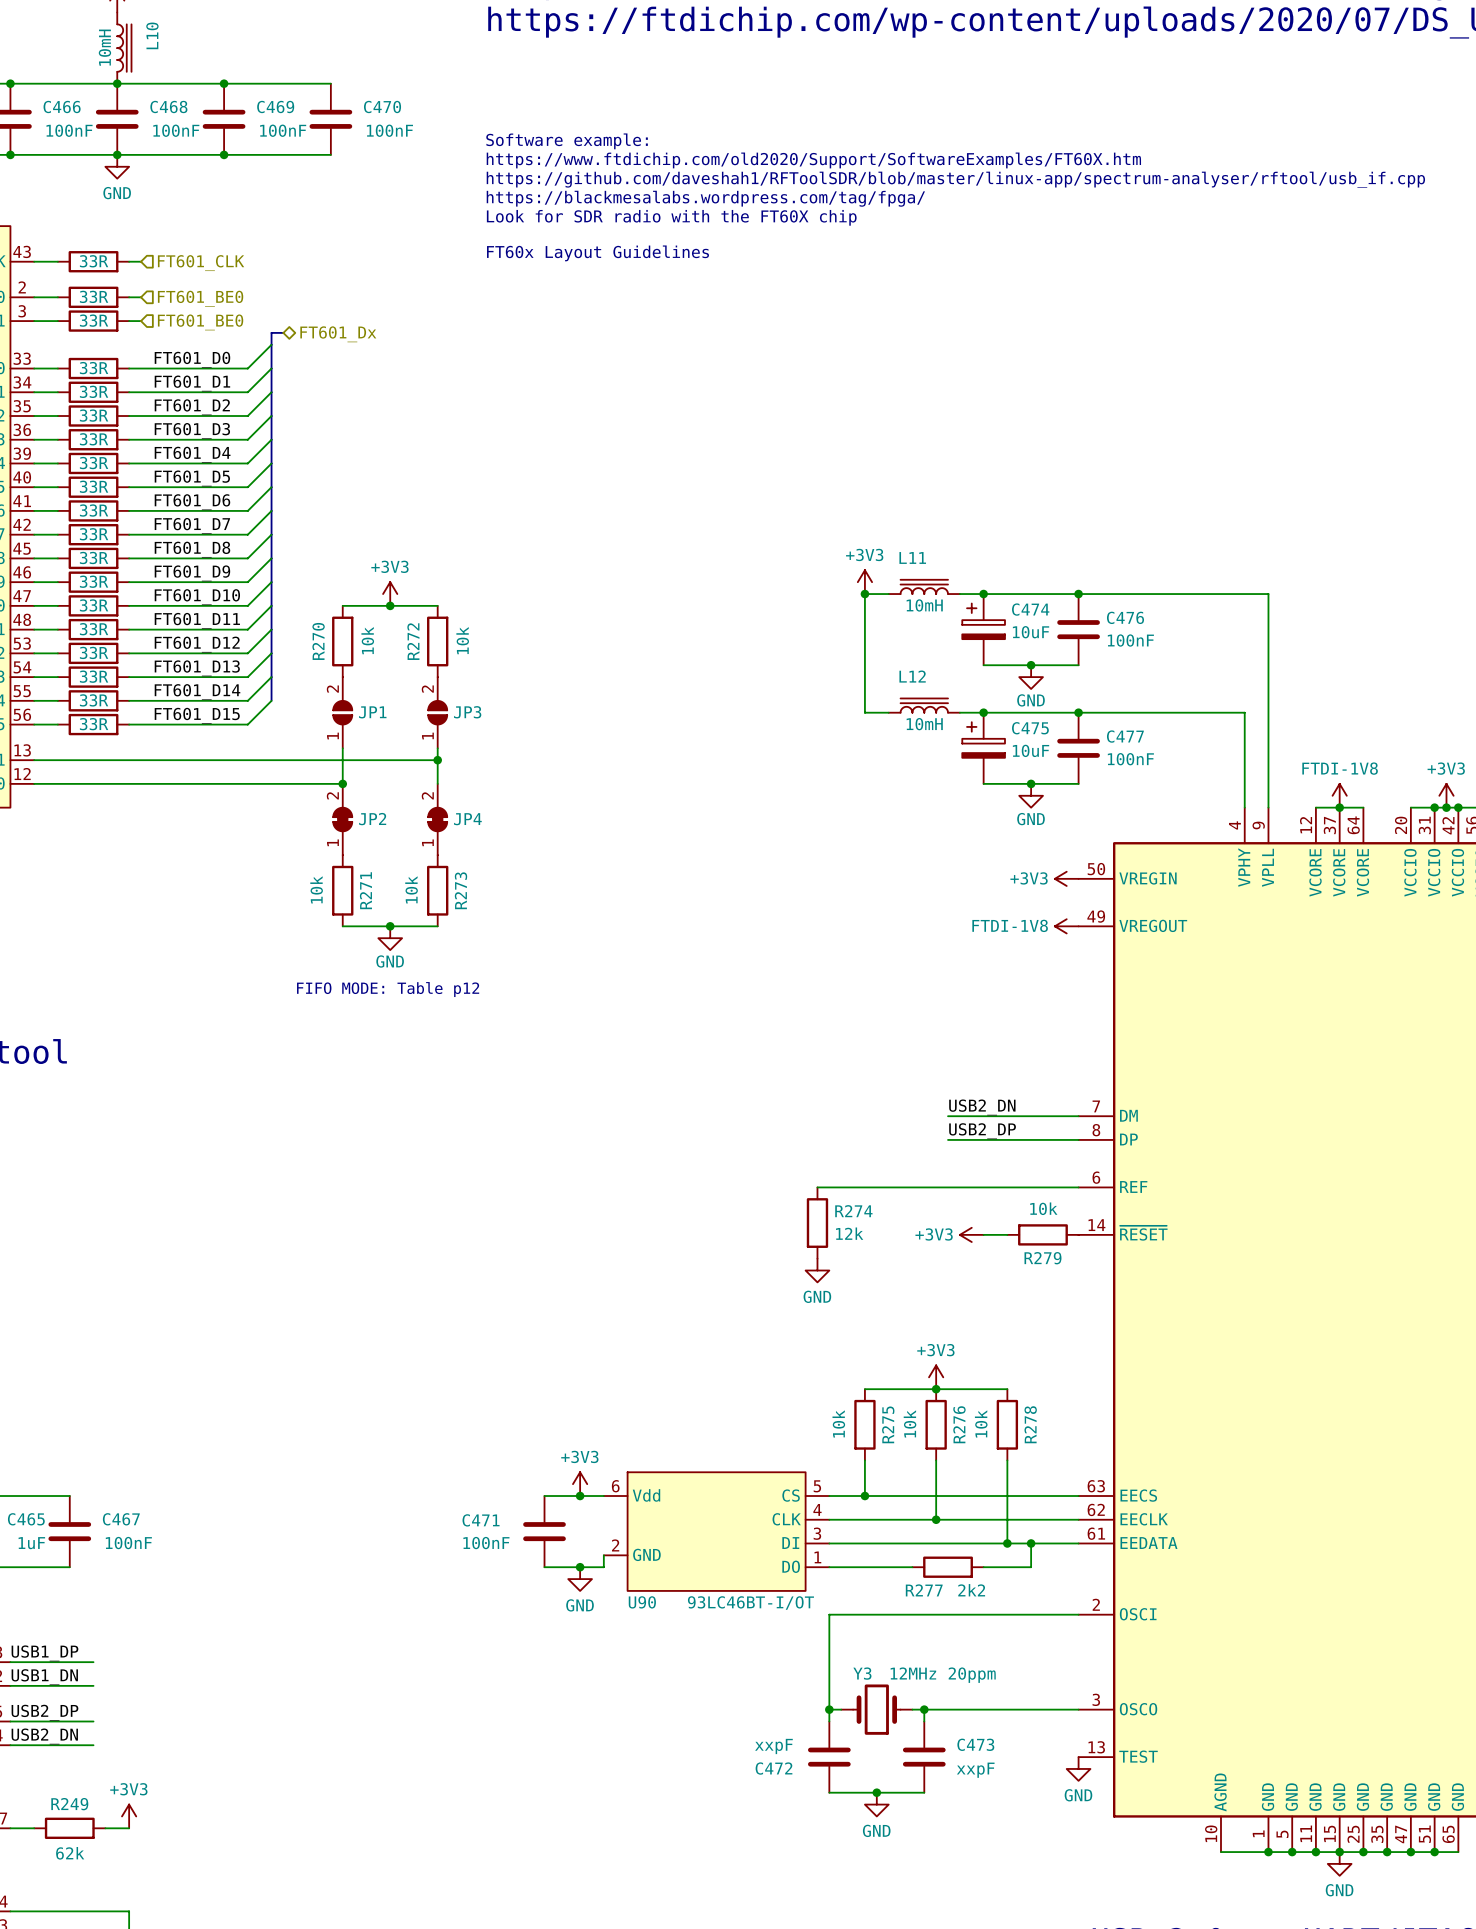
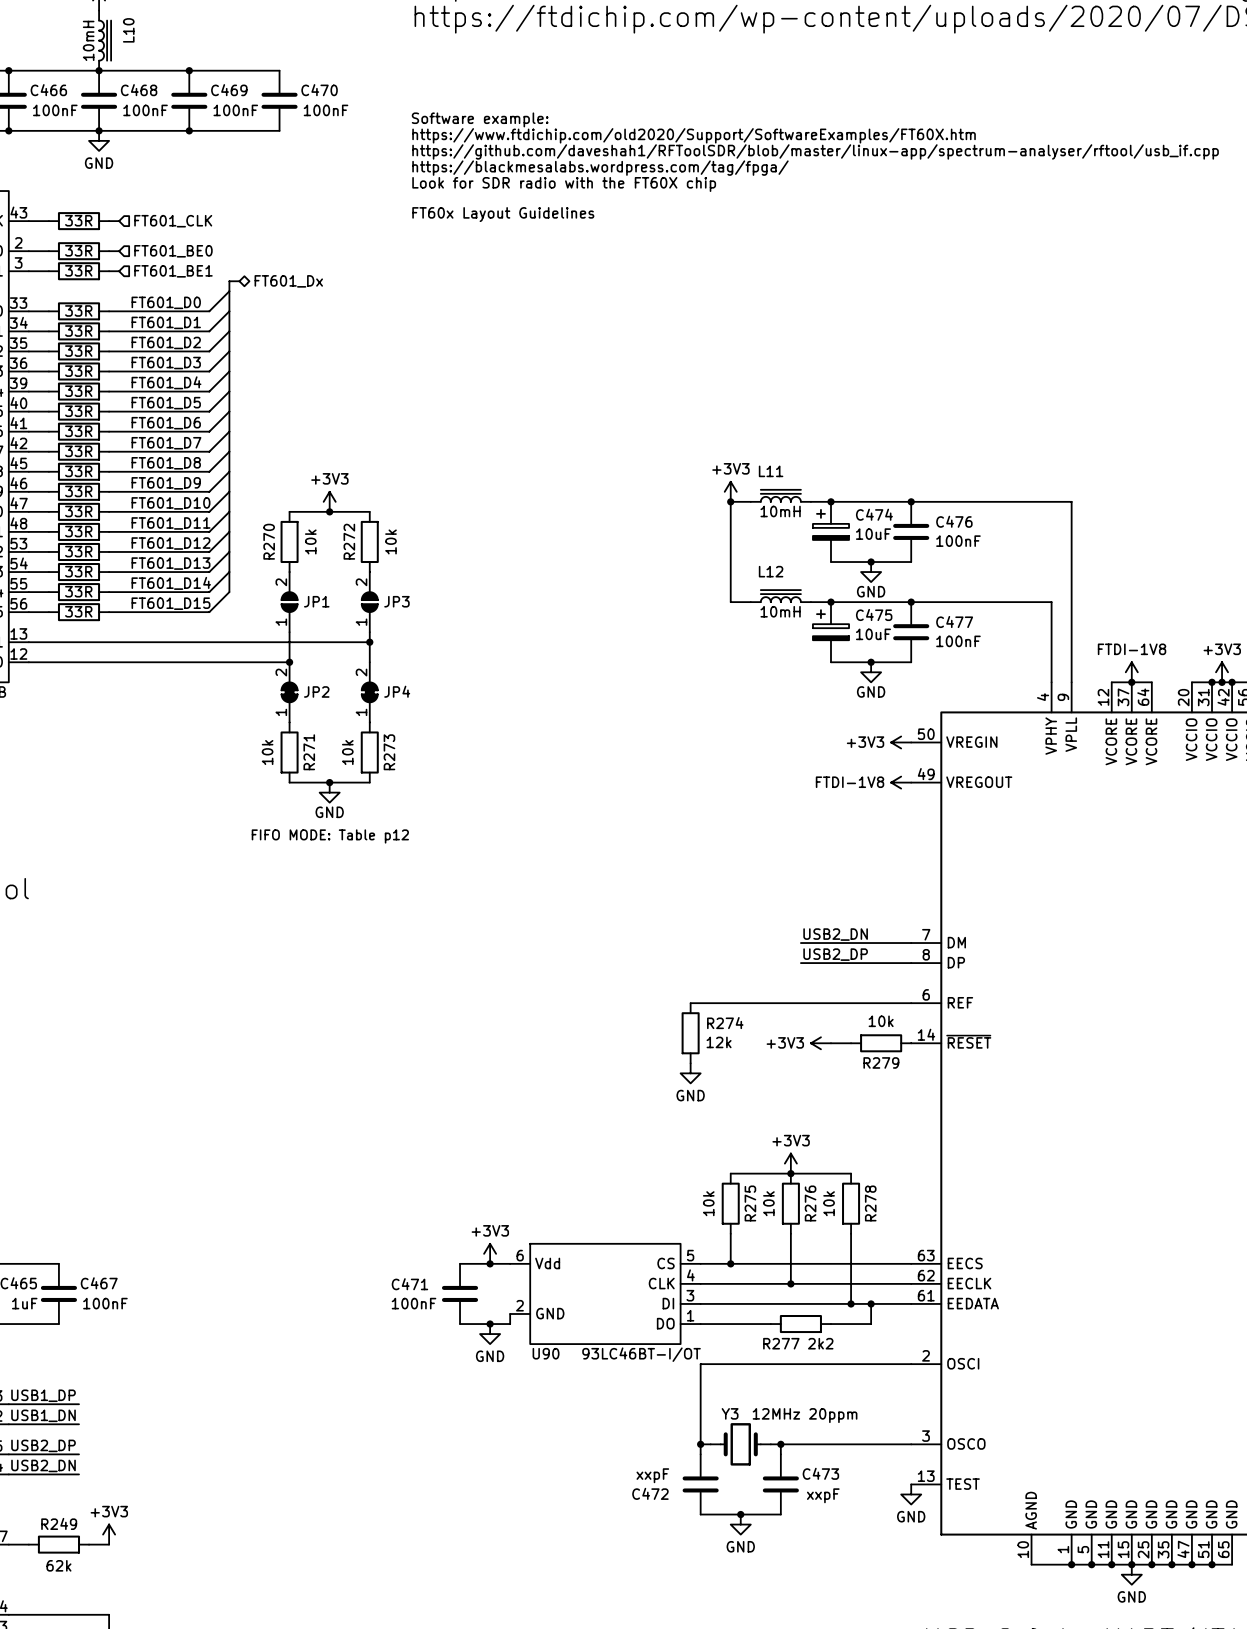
hierarchical label: FT601_BE0 (200, 322) -> FT601_BE1 (173, 271)

